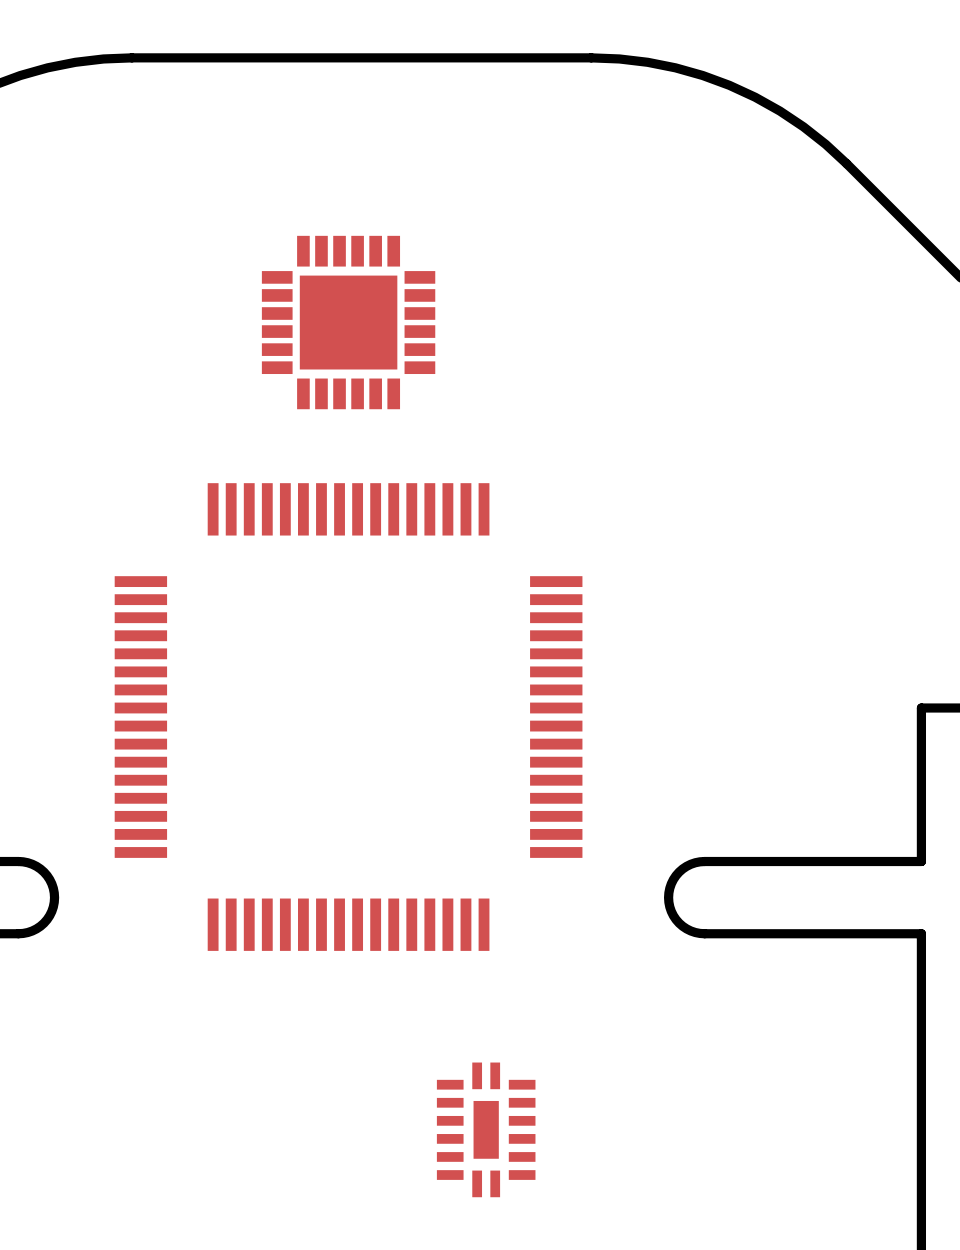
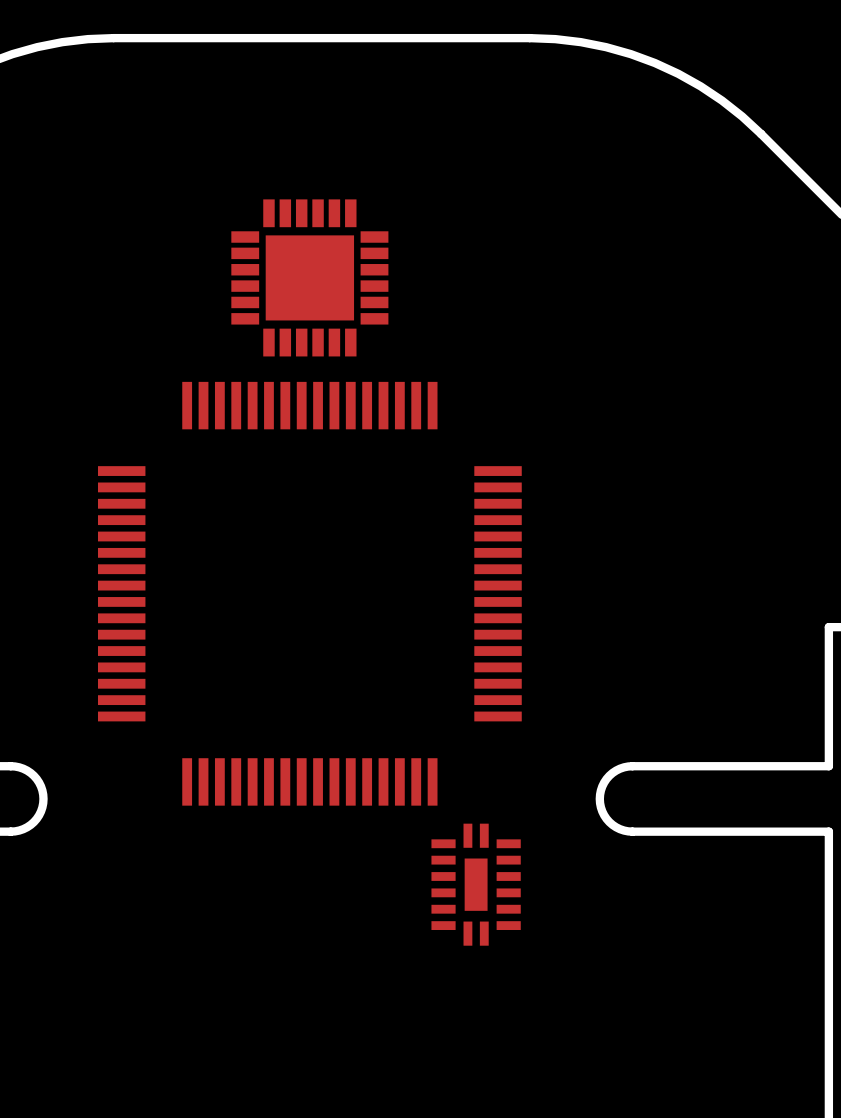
part position: (348, 717) -> (309, 593)
part position: (486, 1129) -> (476, 884)

